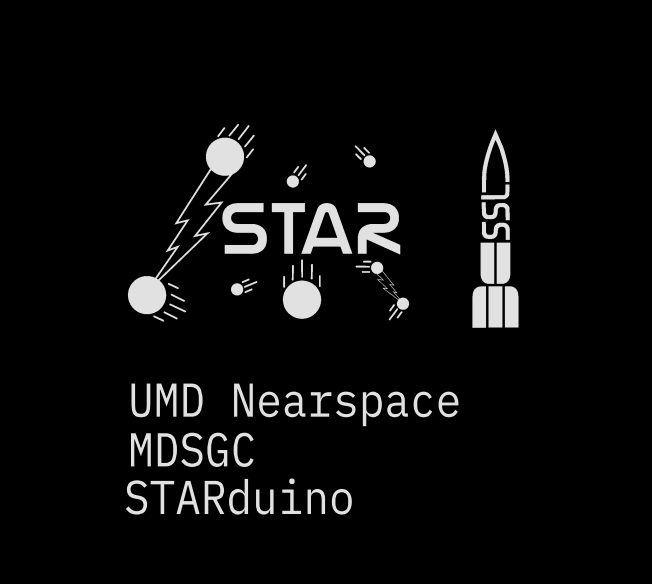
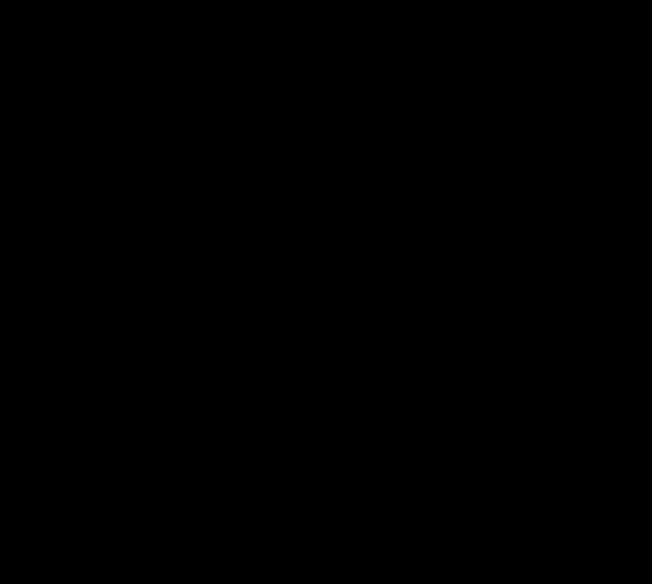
drawing: [127, 123, 410, 322] -> none
drawing: [472, 129, 519, 328] -> none
text: UMD Nearspace (294, 404) -> none
text: MDSGC (192, 449) -> none
text: STARduino (238, 496) -> none

